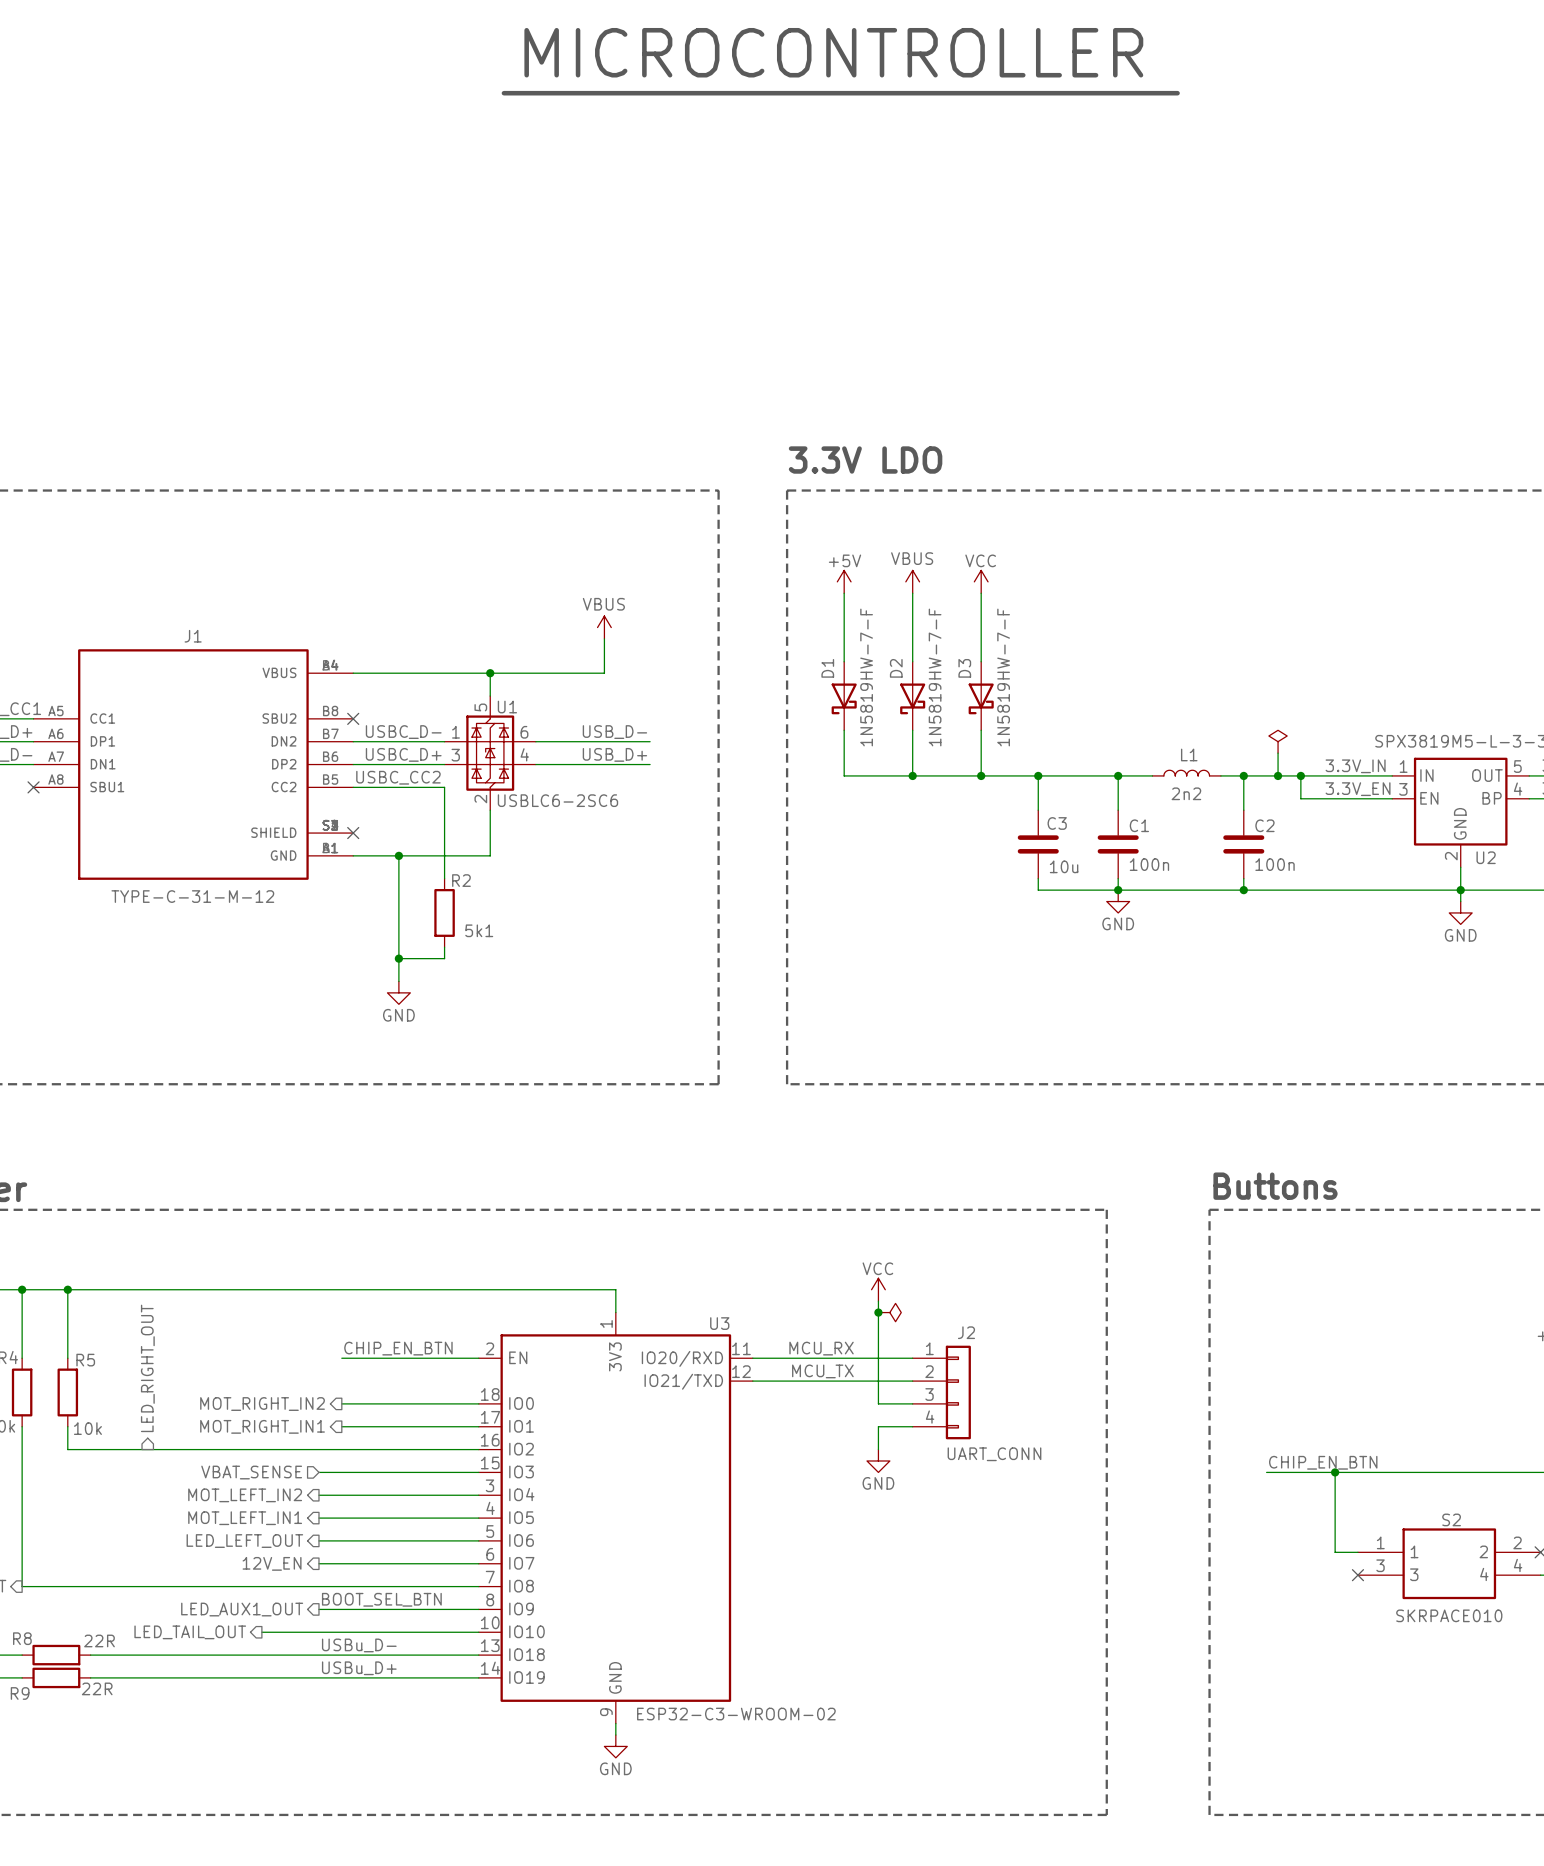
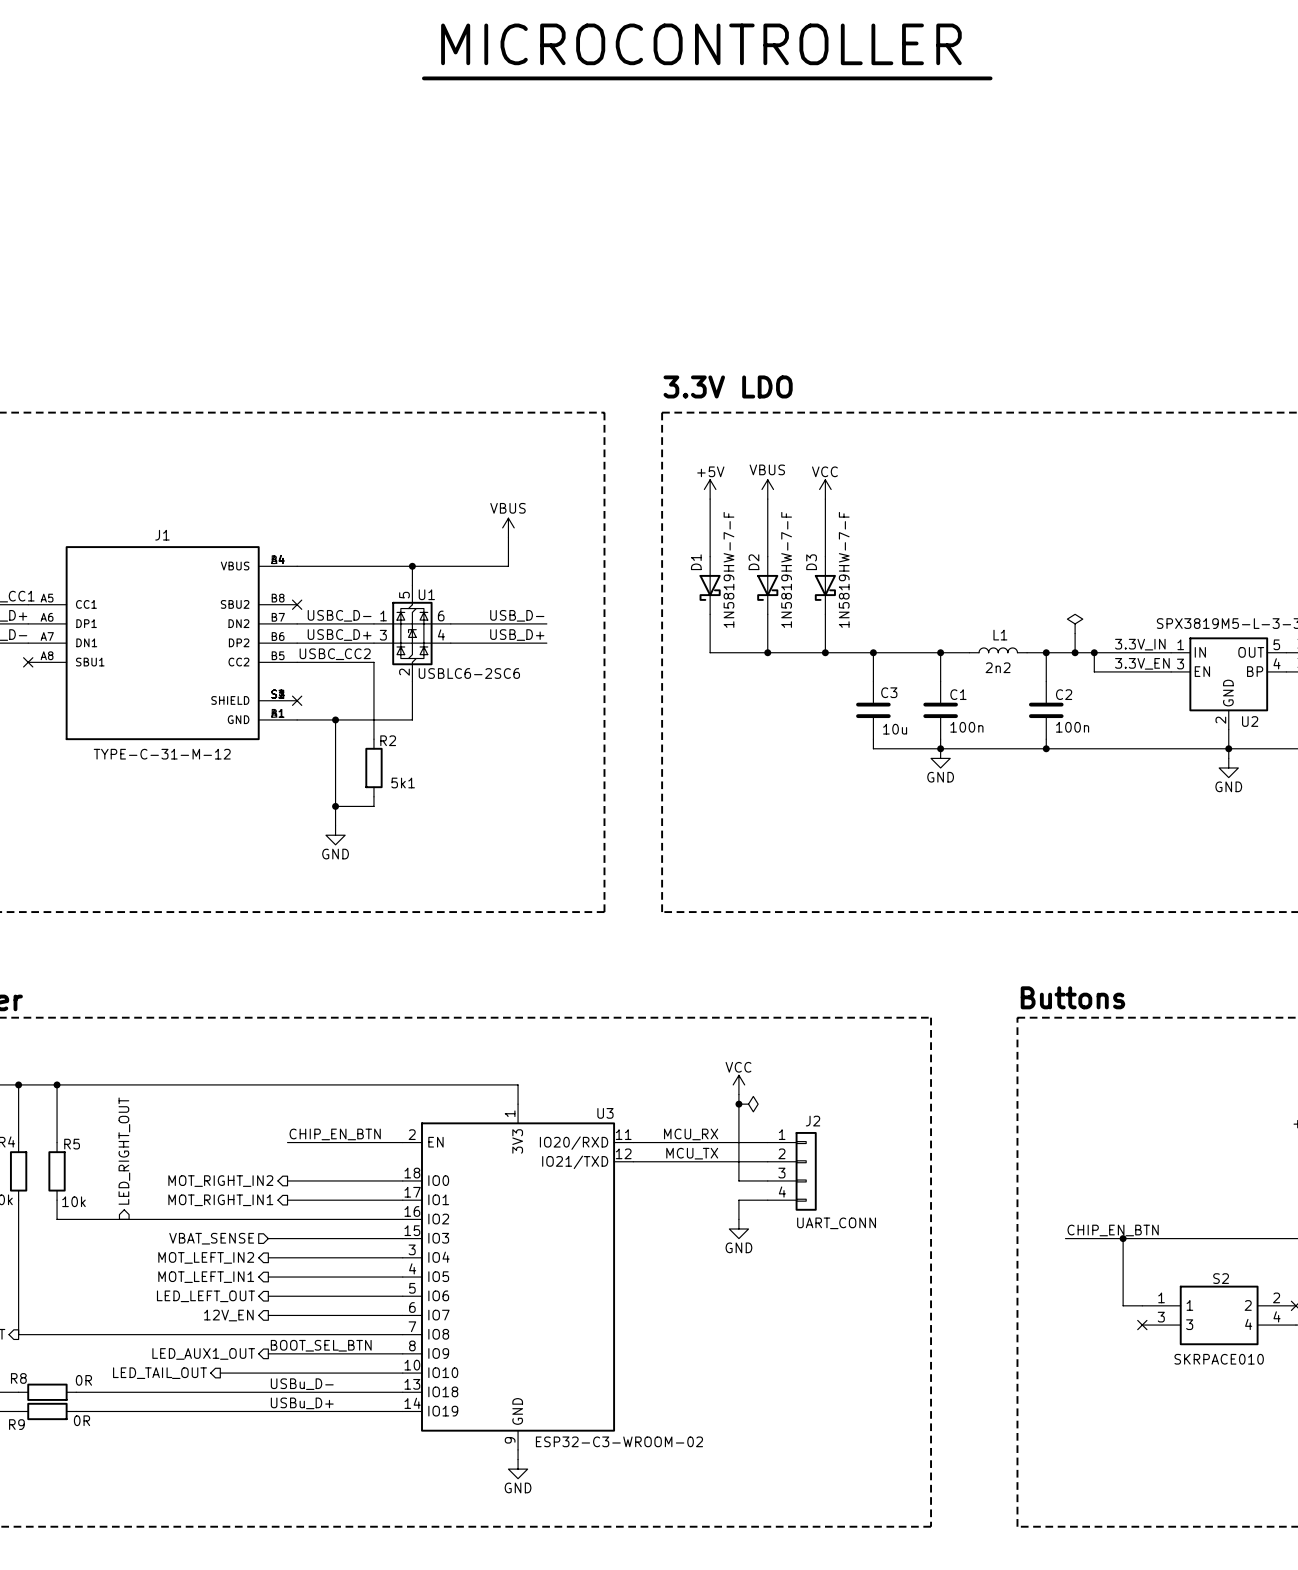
R8 value: 22R (99, 1640) -> 0R (83, 1380)
R9 value: 22R (97, 1688) -> 0R (82, 1420)

